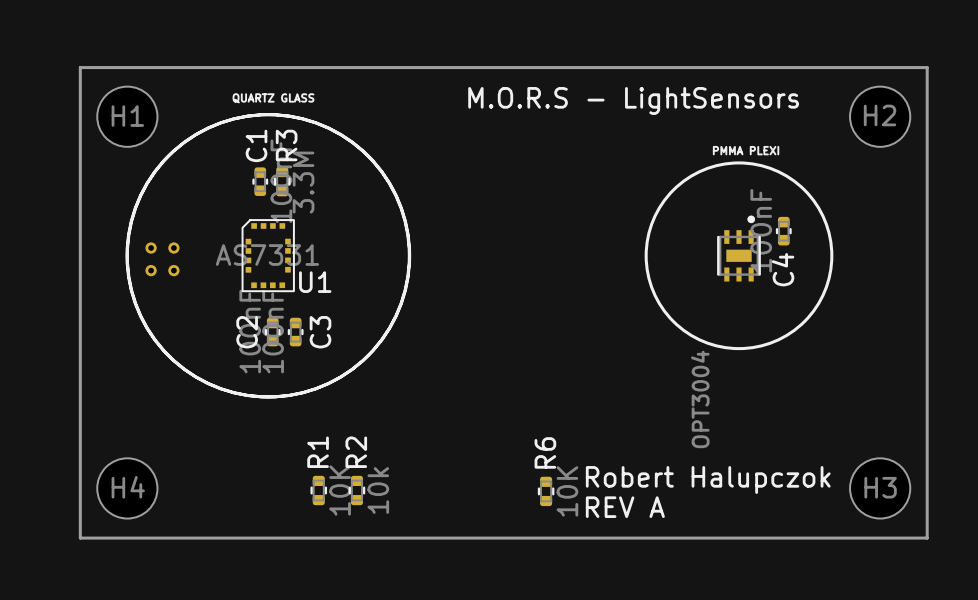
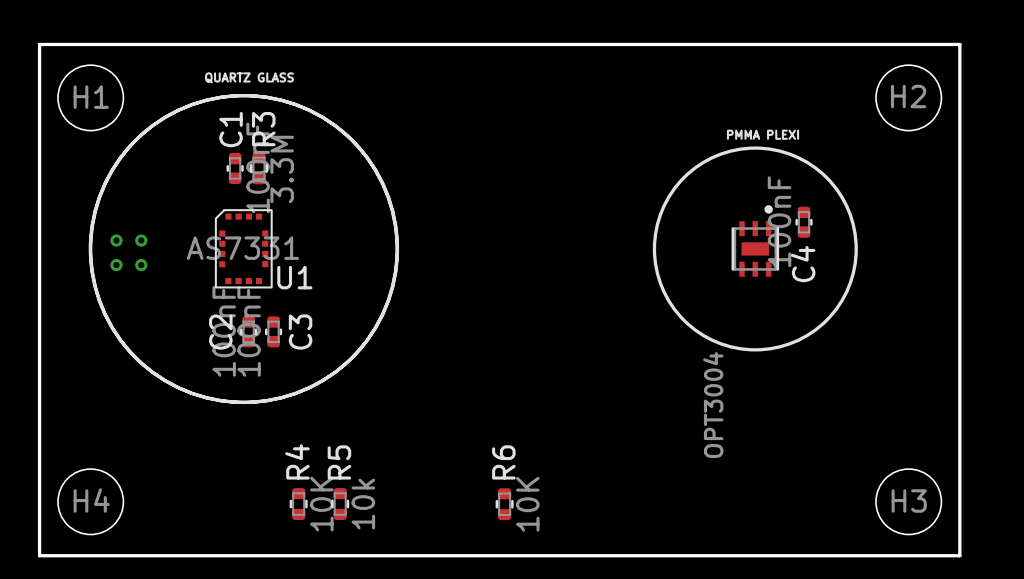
text: M.O.R.S - LightSensors (633, 100) -> none
R1 name: R1 (318, 452) -> R4 (297, 461)
R2 name: R2 (356, 452) -> R5 (339, 462)
text: Robert Halupczok (708, 480) -> none
R6 position: (546, 491) -> (504, 504)
text: REV A (625, 507) -> none

